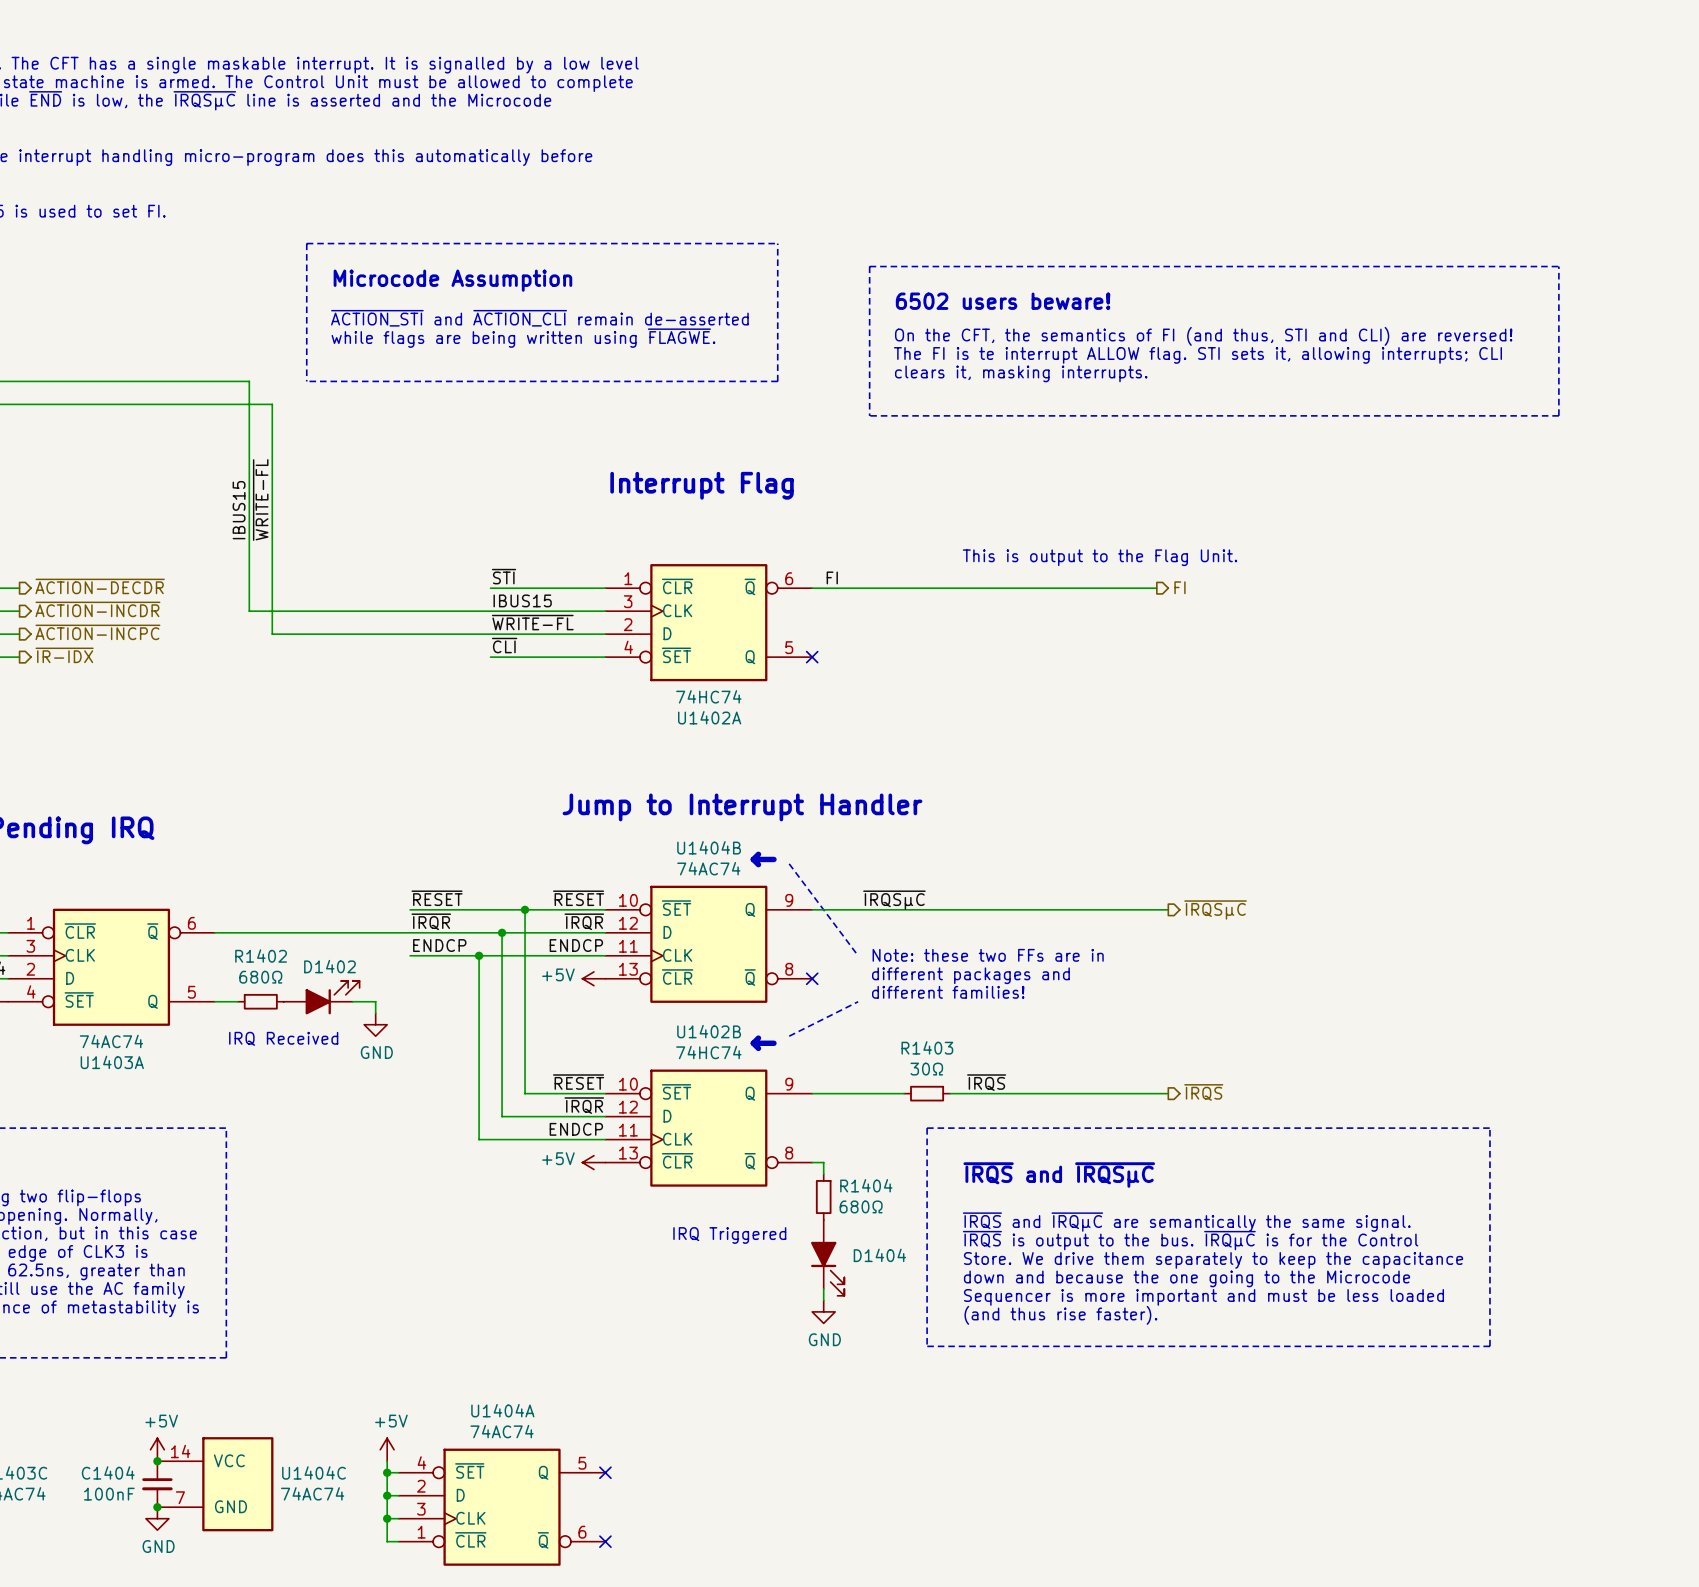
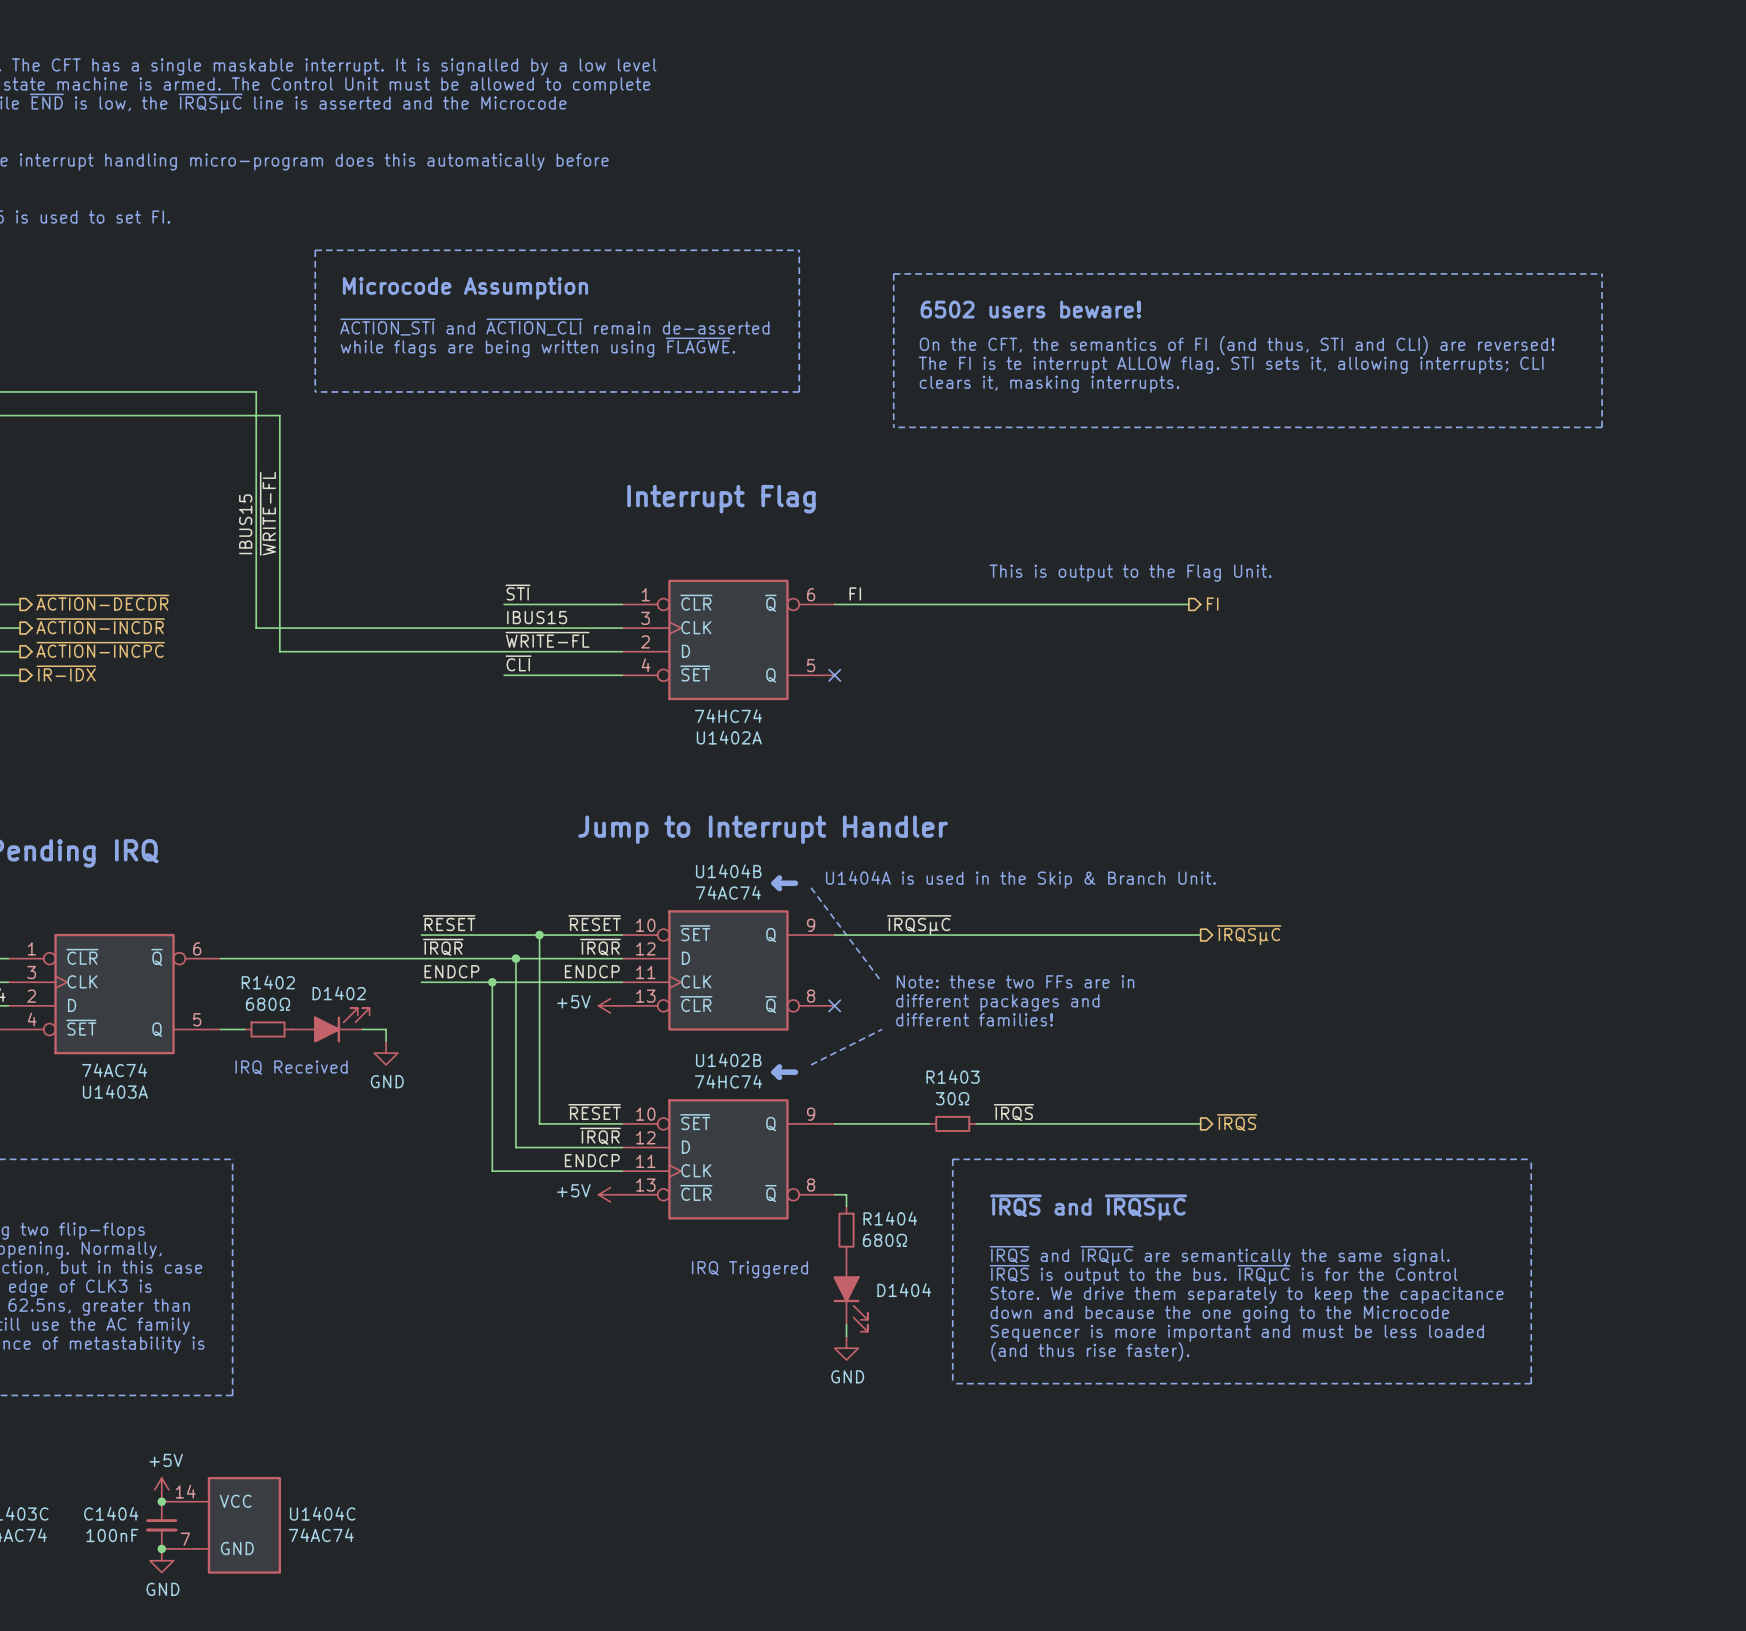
text: none -> U1404A is used in the Skip & Branch Unit. (1020, 879)
power symbol: +5V (387, 1449) -> none
wire: (387, 1461) (387, 1541) (398, 1541) -> none
wire: (387, 1472) (398, 1472) -> none
junction: (387, 1472) -> none
no-connect mark: (605, 1472) -> none
wire: (387, 1495) (398, 1495) -> none
junction: (387, 1495) -> none
U1404A: 74AC74 (502, 1507) -> none
wire: (387, 1518) (398, 1518) -> none
junction: (387, 1518) -> none
no-connect mark: (605, 1541) -> none

